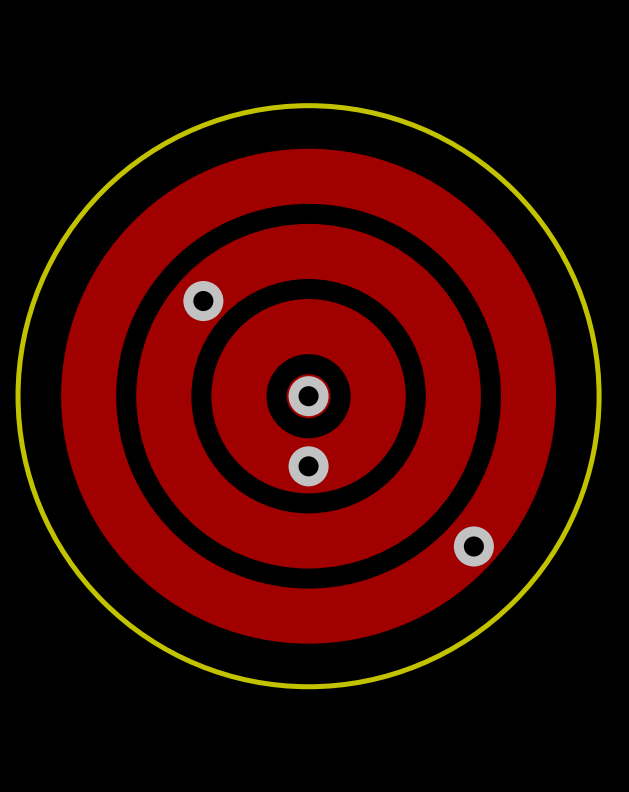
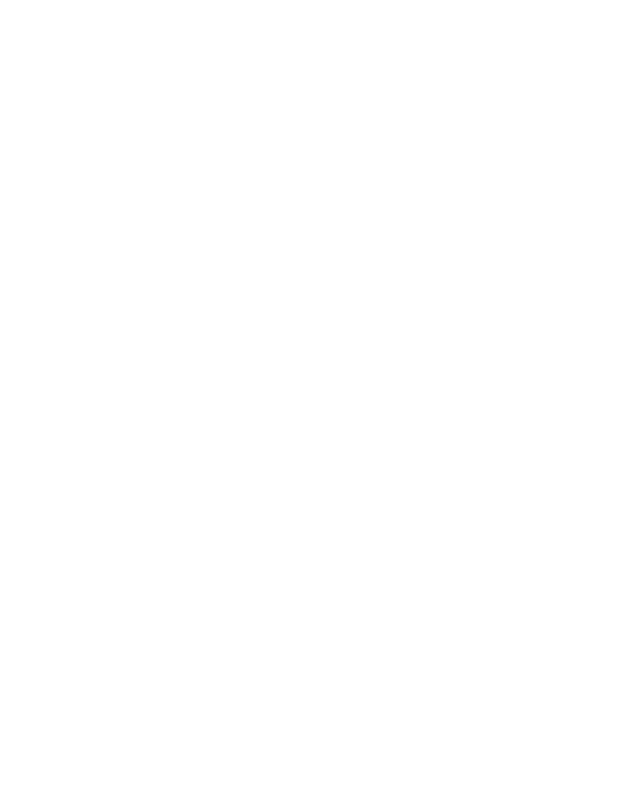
round board edge: [15, 103, 602, 690] -> none
drawing: [61, 148, 557, 644] -> none
via: (203, 301) -> none
via: (308, 396) -> none
via: (308, 466) -> none
via: (473, 546) -> none

